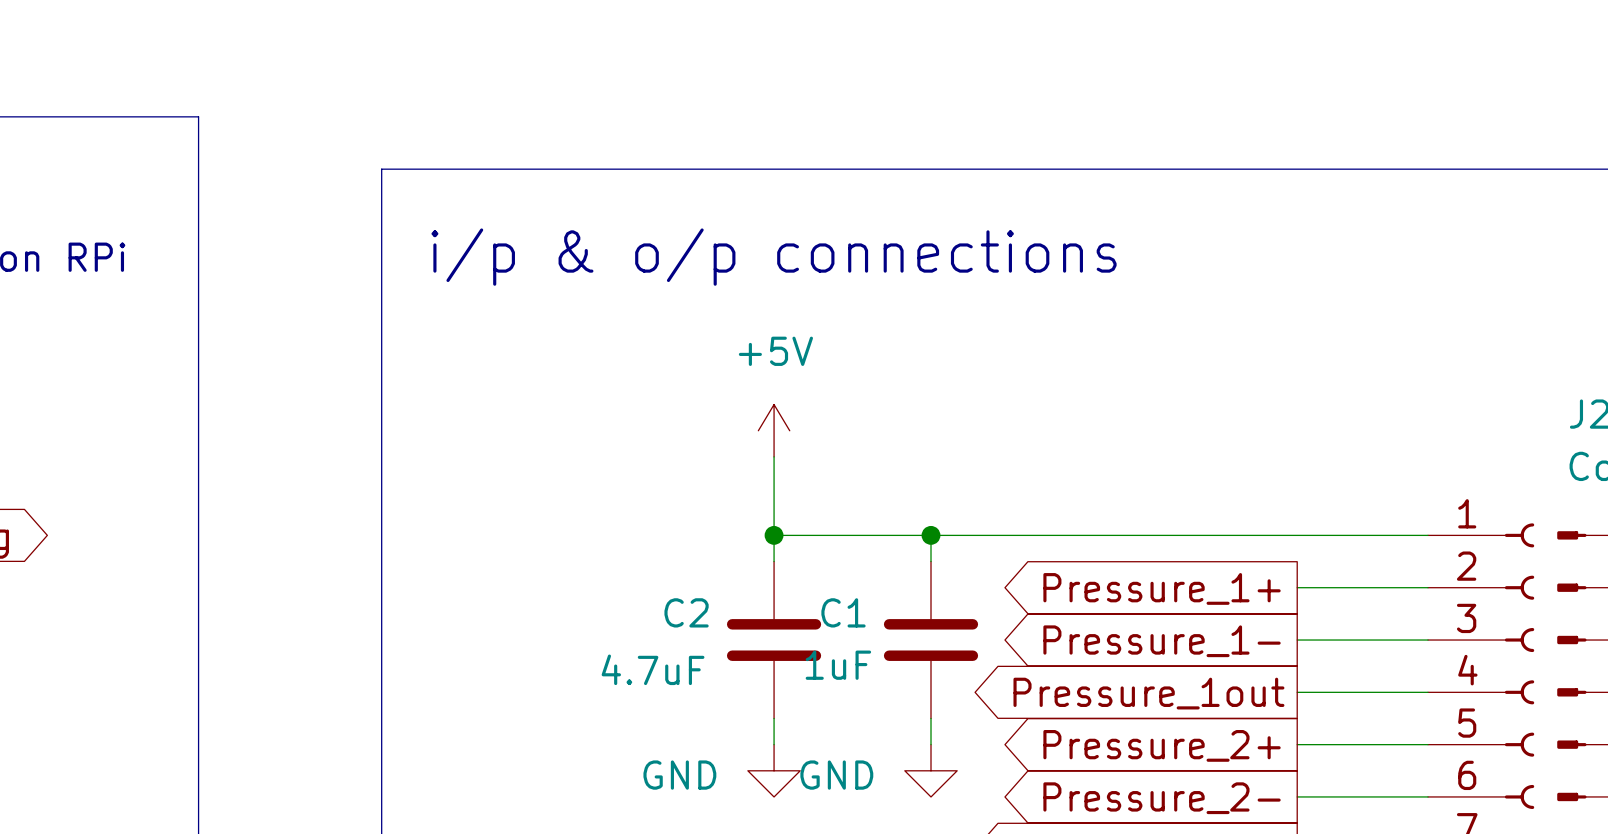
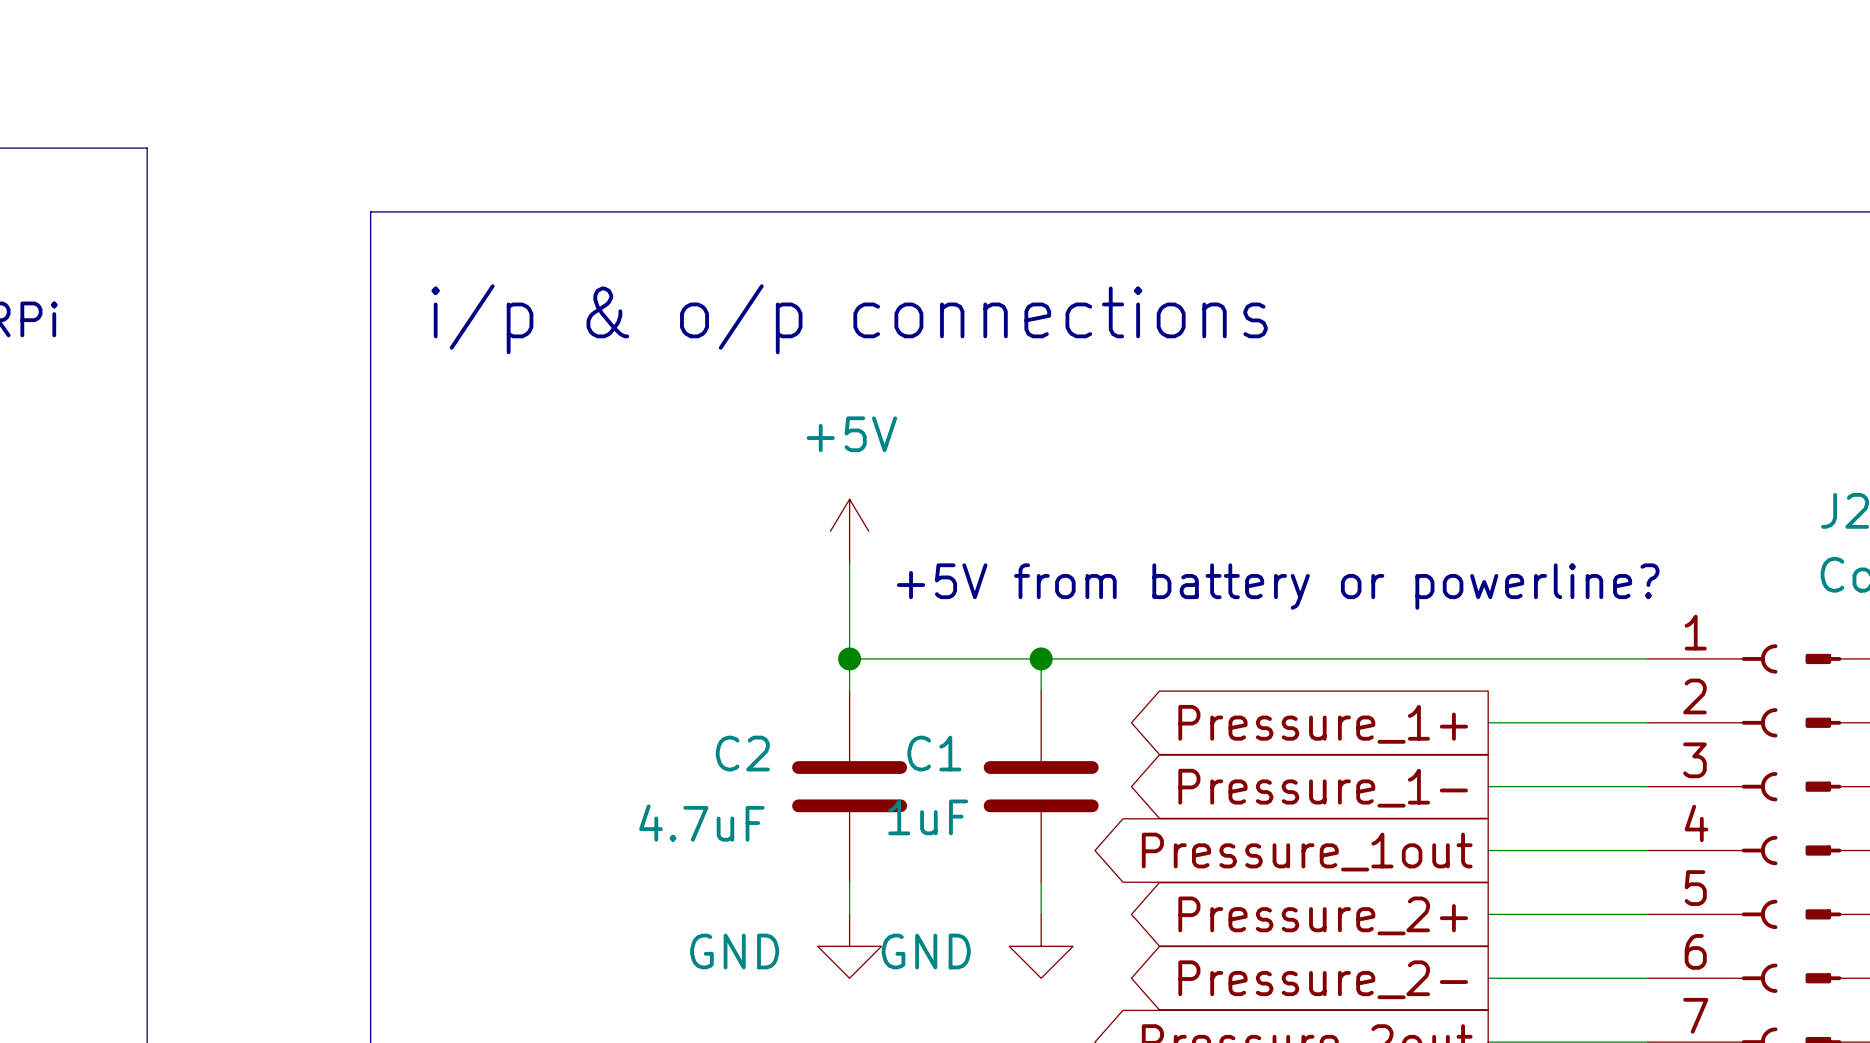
text: none -> +5V from battery or powerline? (1278, 586)

